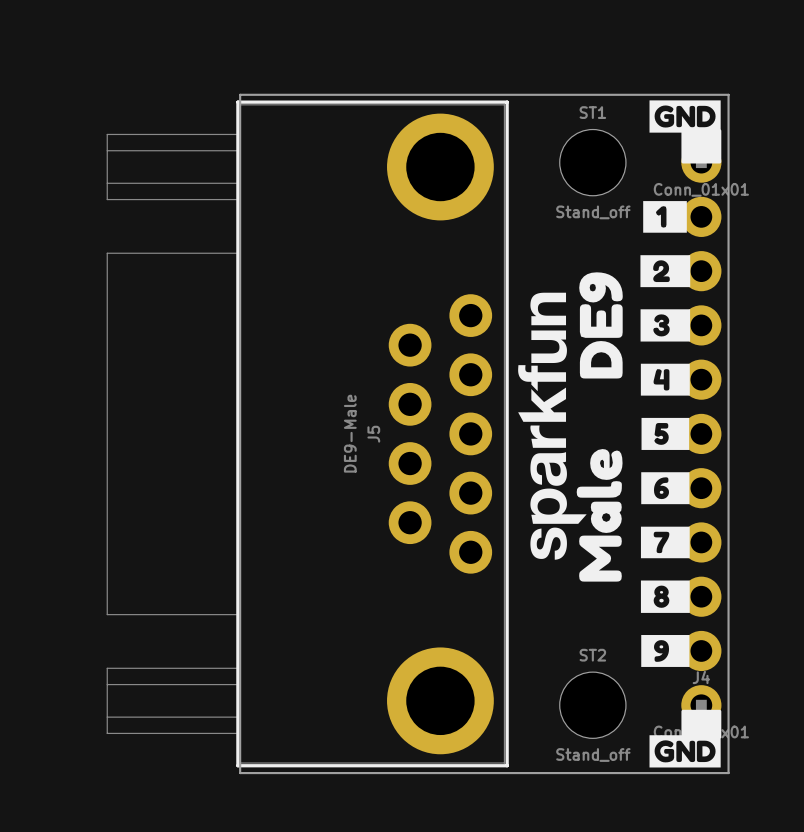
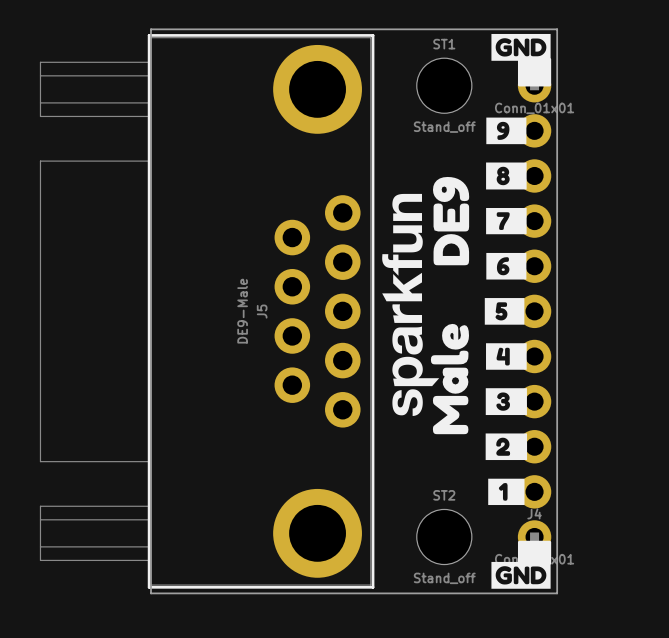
drawing position: (665, 216) -> (506, 491)
drawing position: (665, 271) -> (506, 446)
drawing position: (665, 325) -> (506, 401)
drawing position: (665, 379) -> (506, 356)
drawing position: (665, 488) -> (506, 266)
drawing position: (665, 542) -> (506, 221)
drawing position: (665, 596) -> (506, 175)
drawing position: (665, 650) -> (506, 130)

